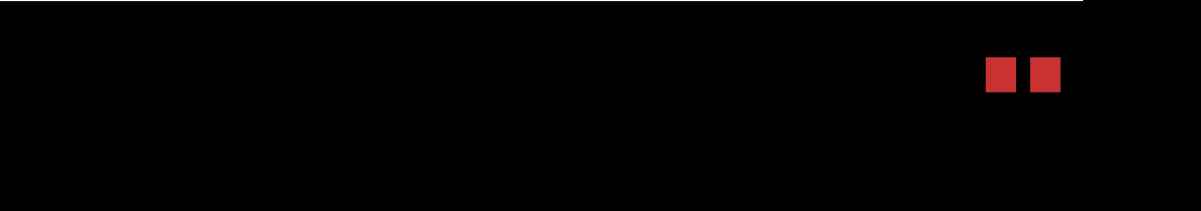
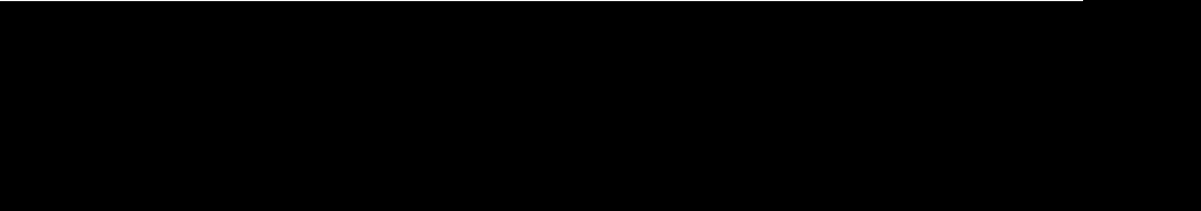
part: (1023, 74) -> none

